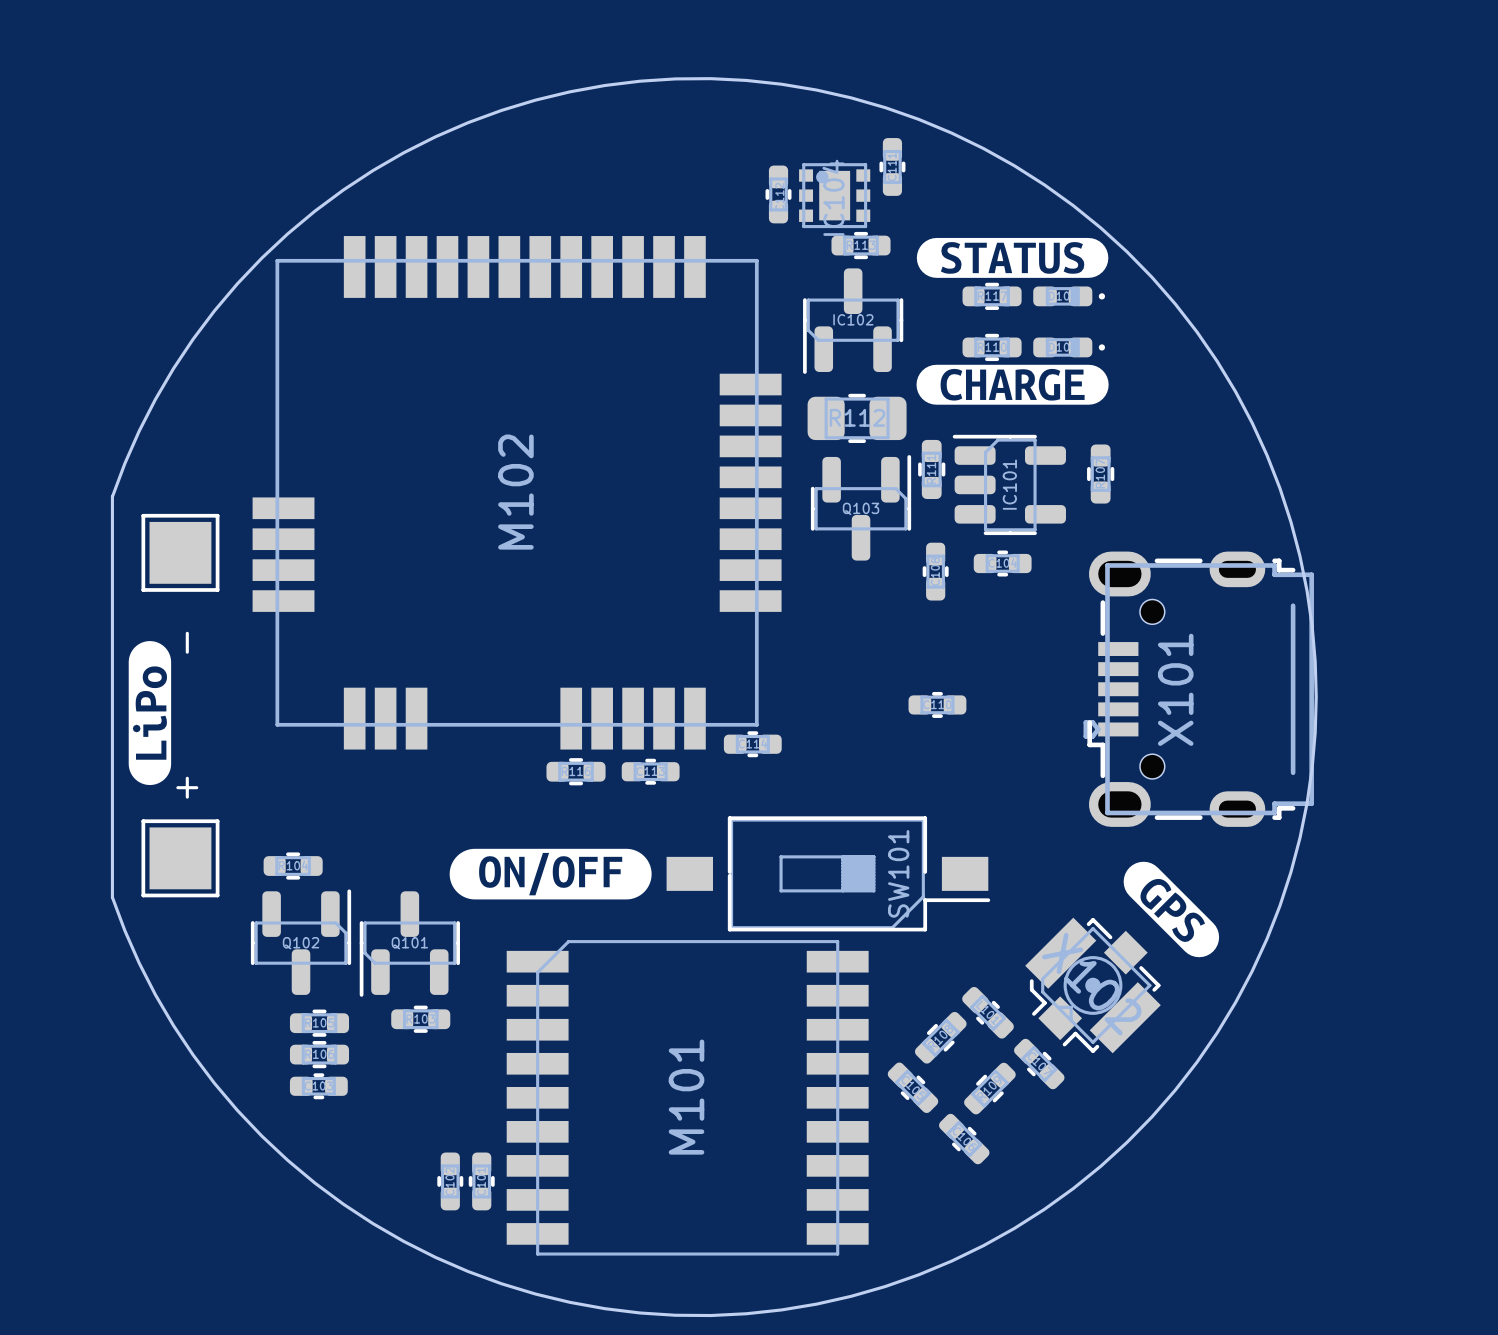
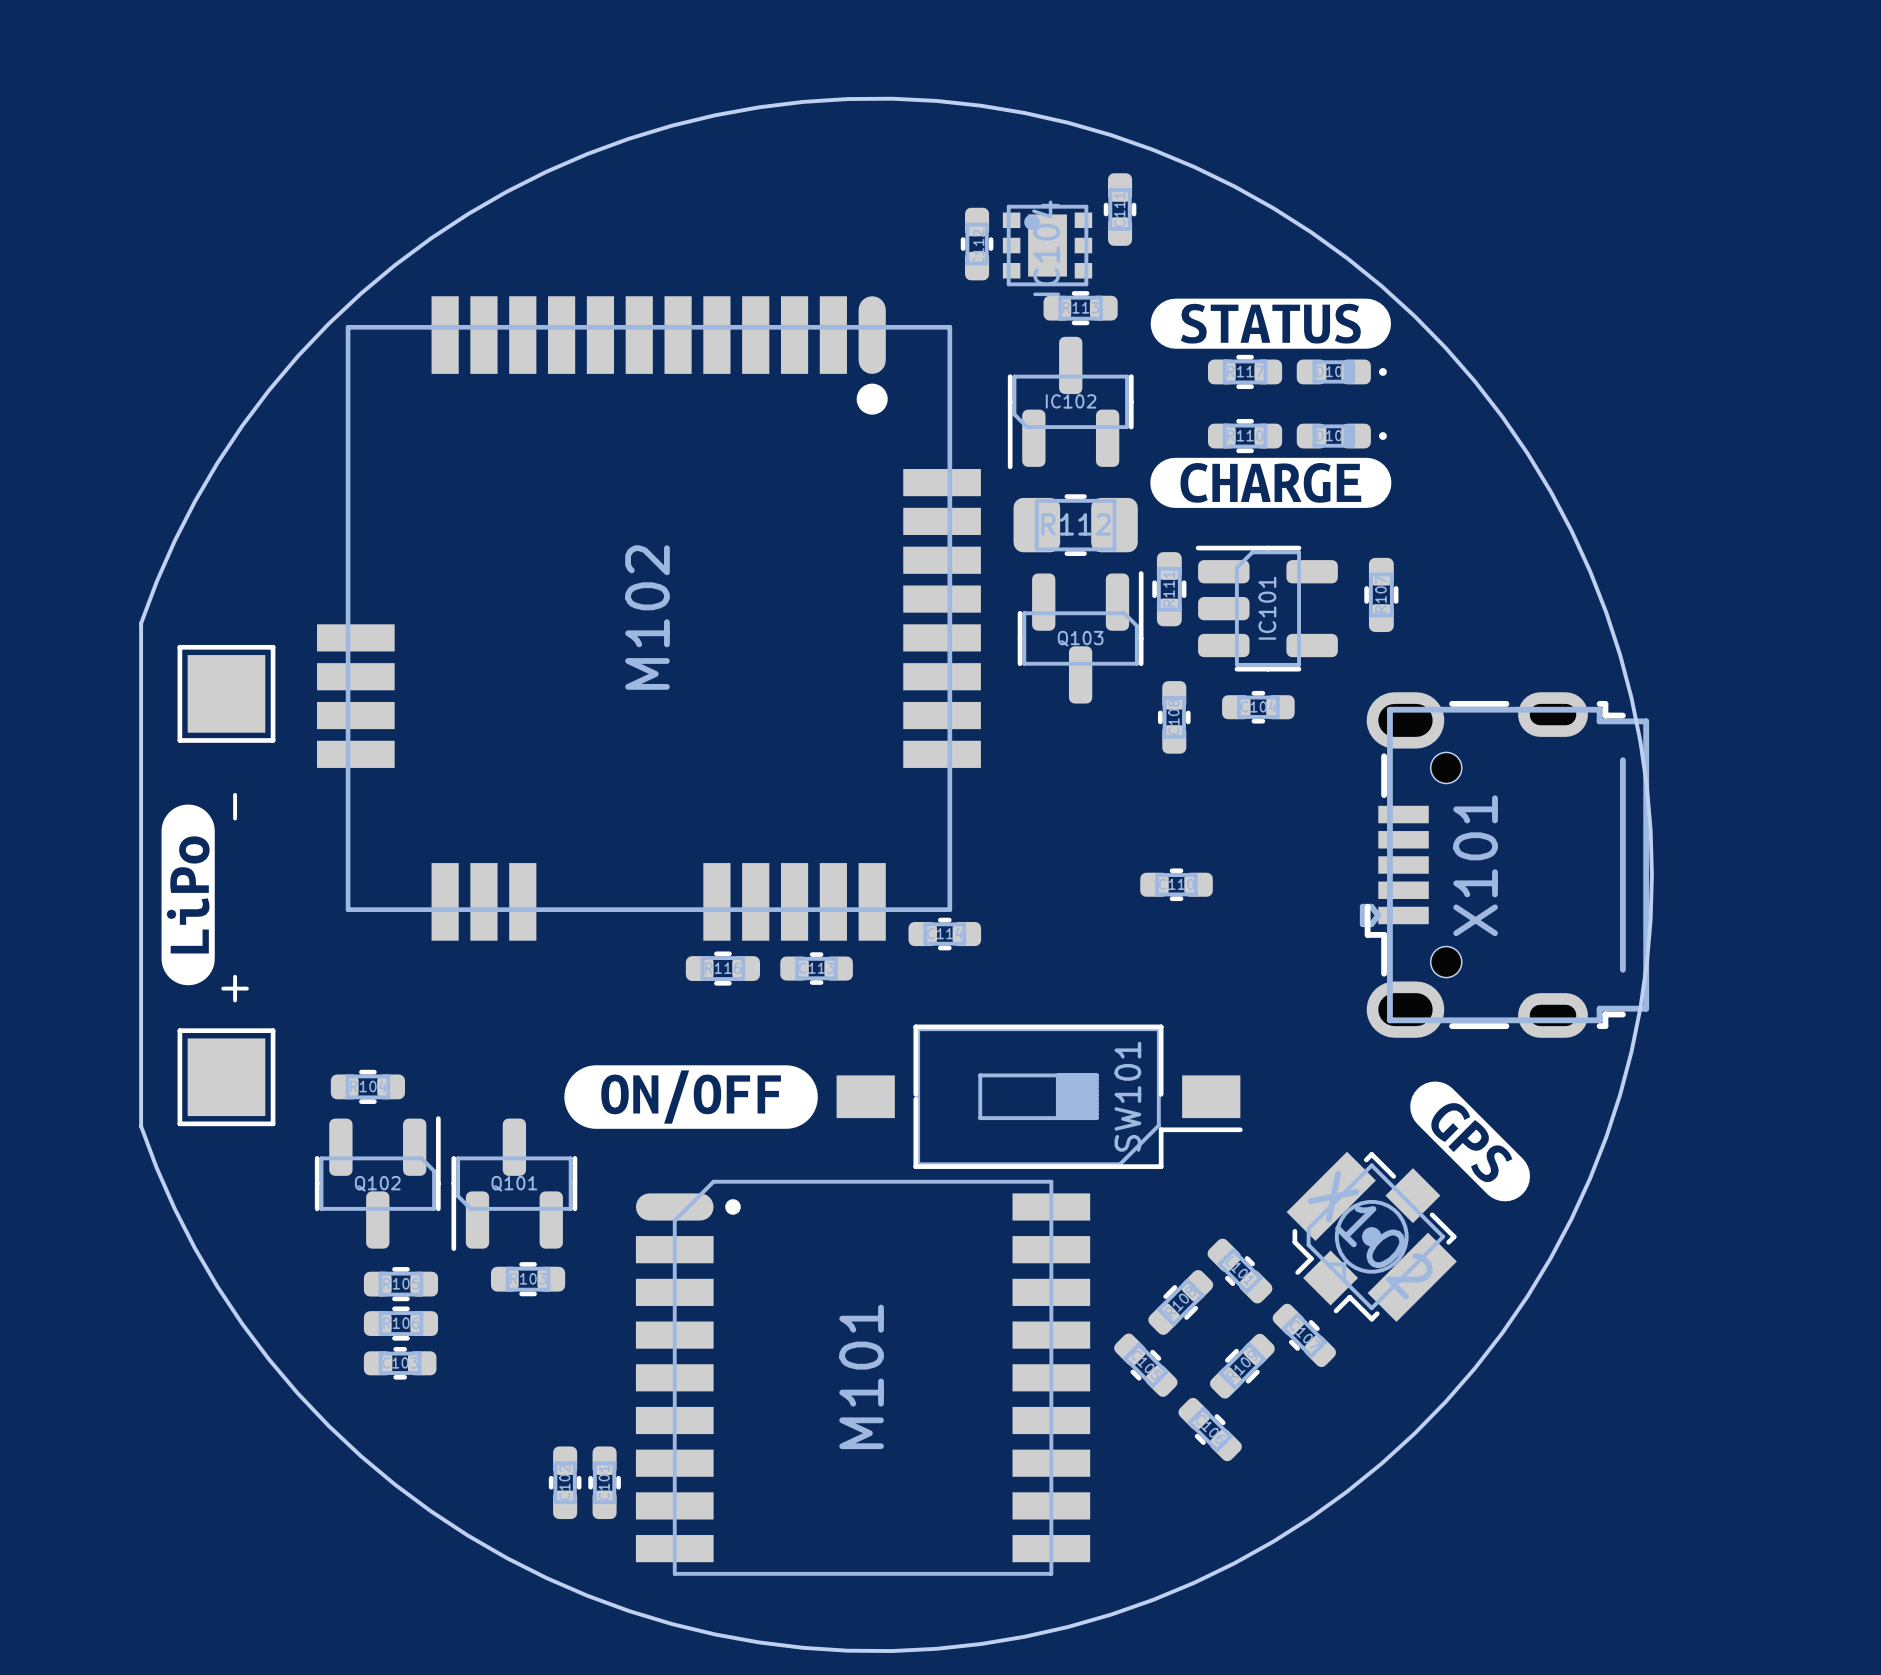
M102 footprint: [252, 236, 782, 750] -> [317, 296, 981, 941]
M101 footprint: [506, 940, 869, 1256] -> [635, 1179, 1091, 1576]

